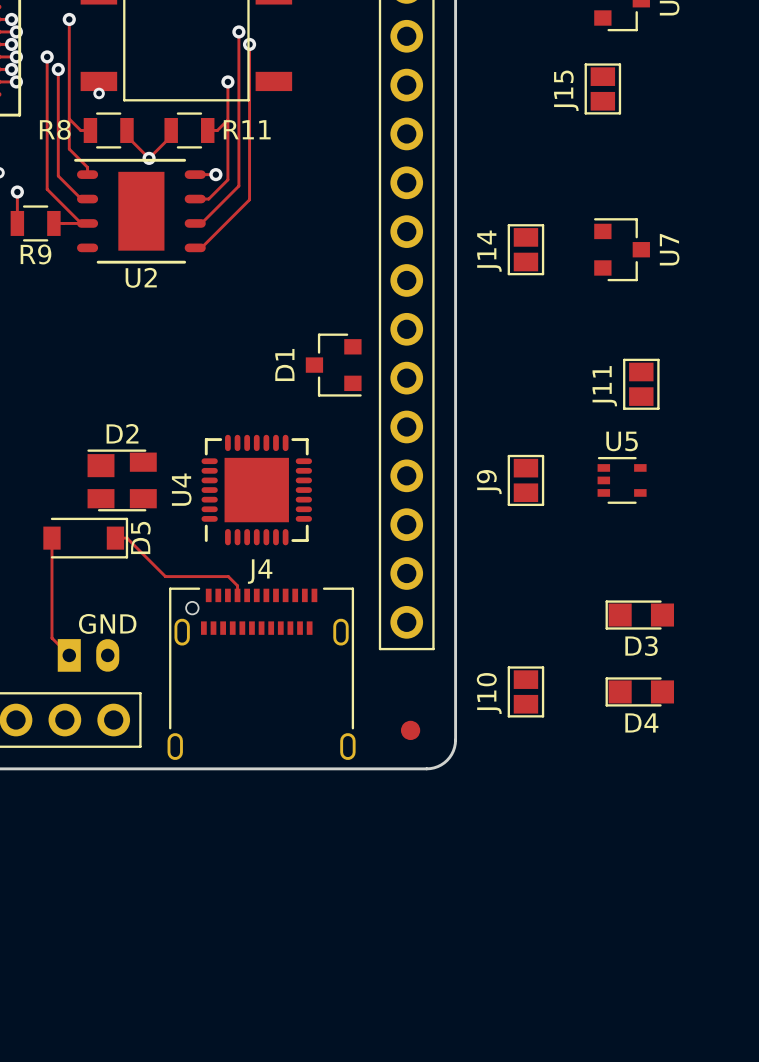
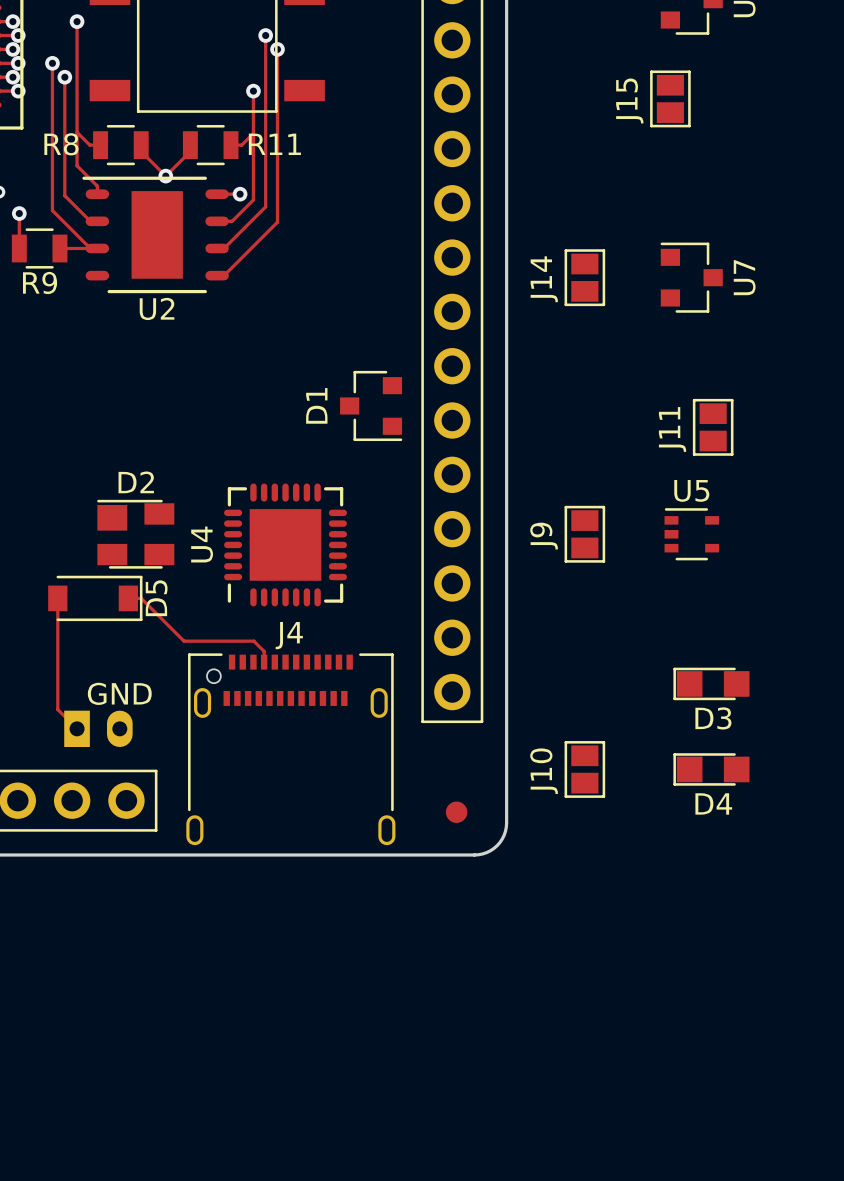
via: (99, 93) -> none

